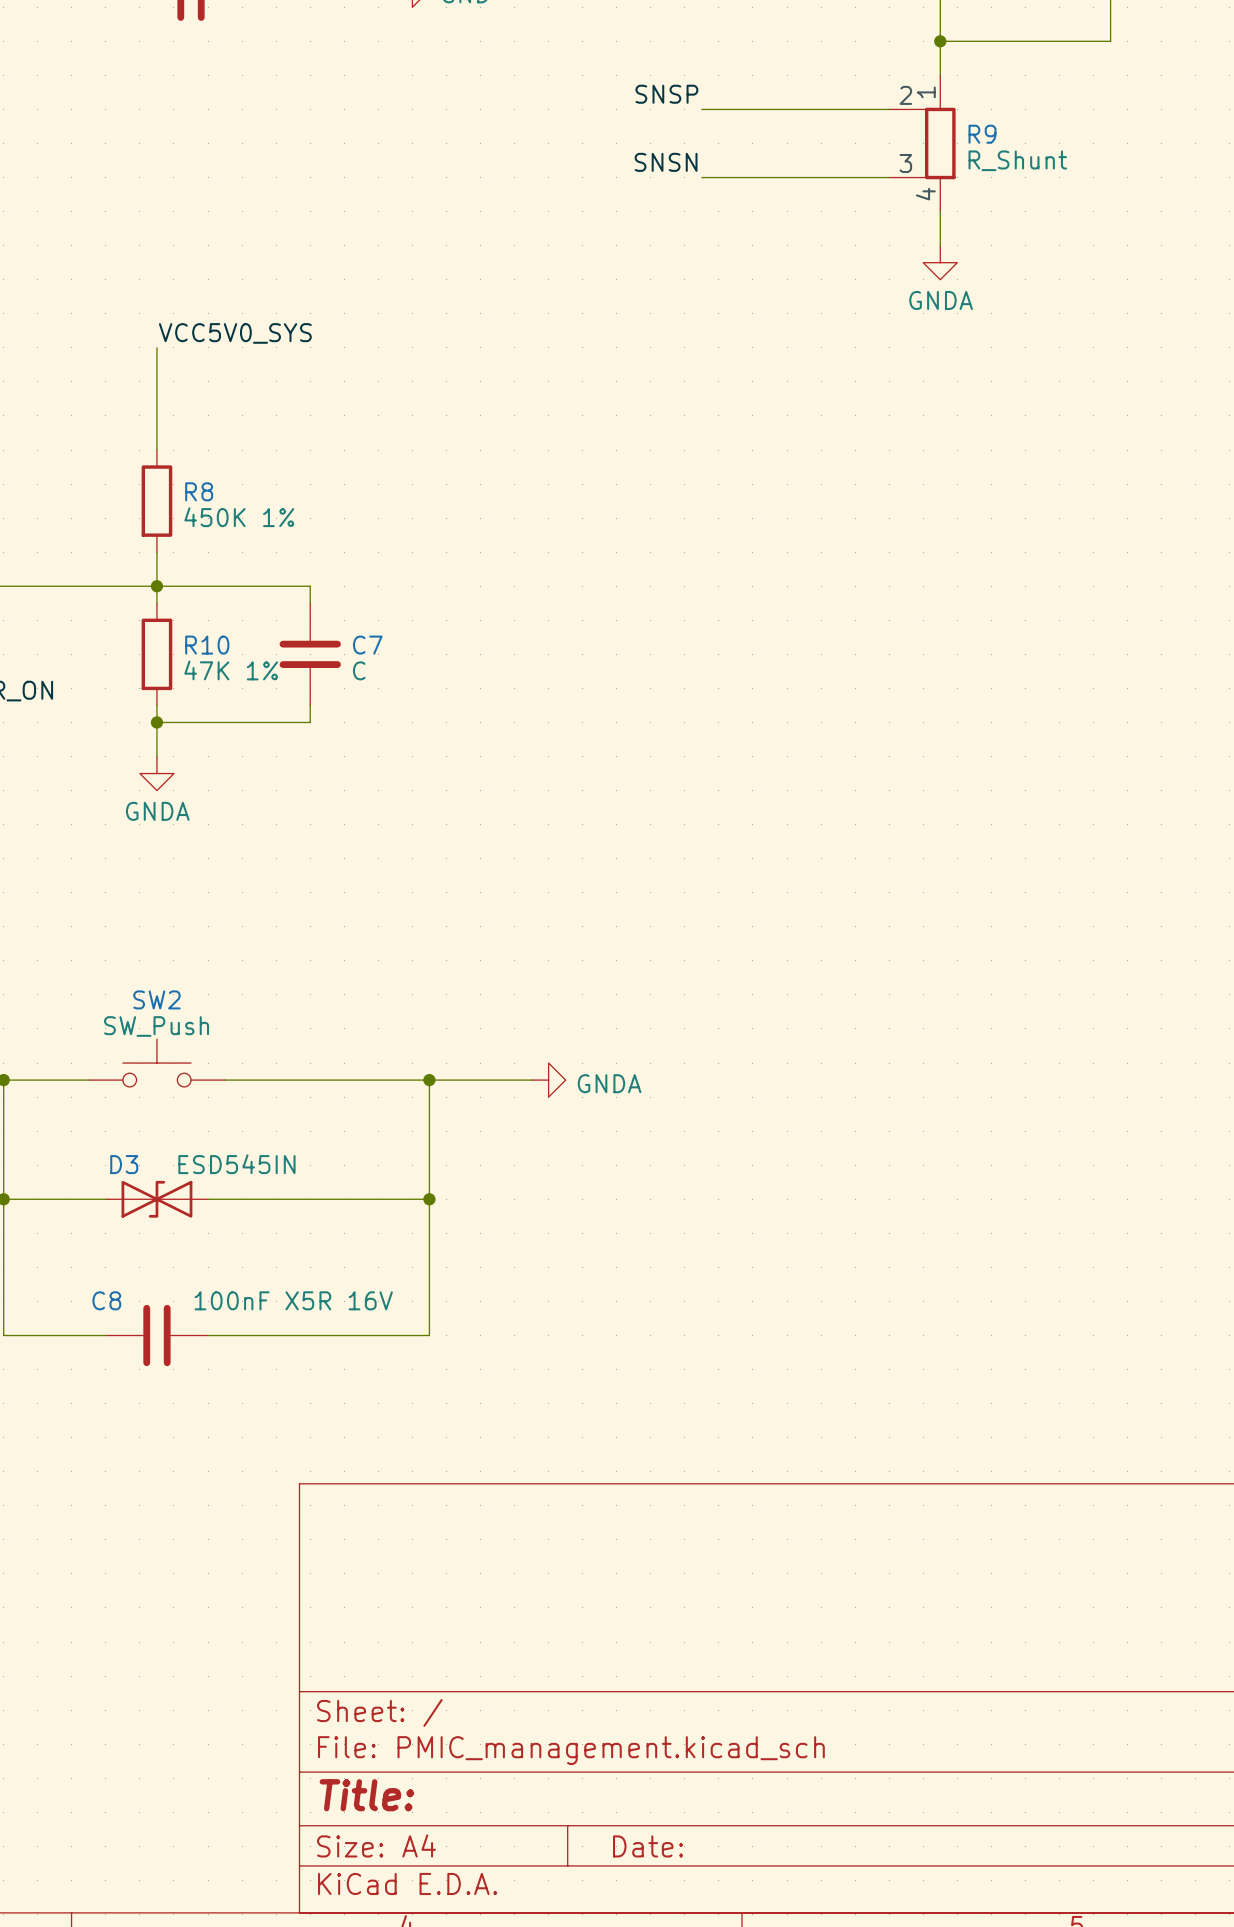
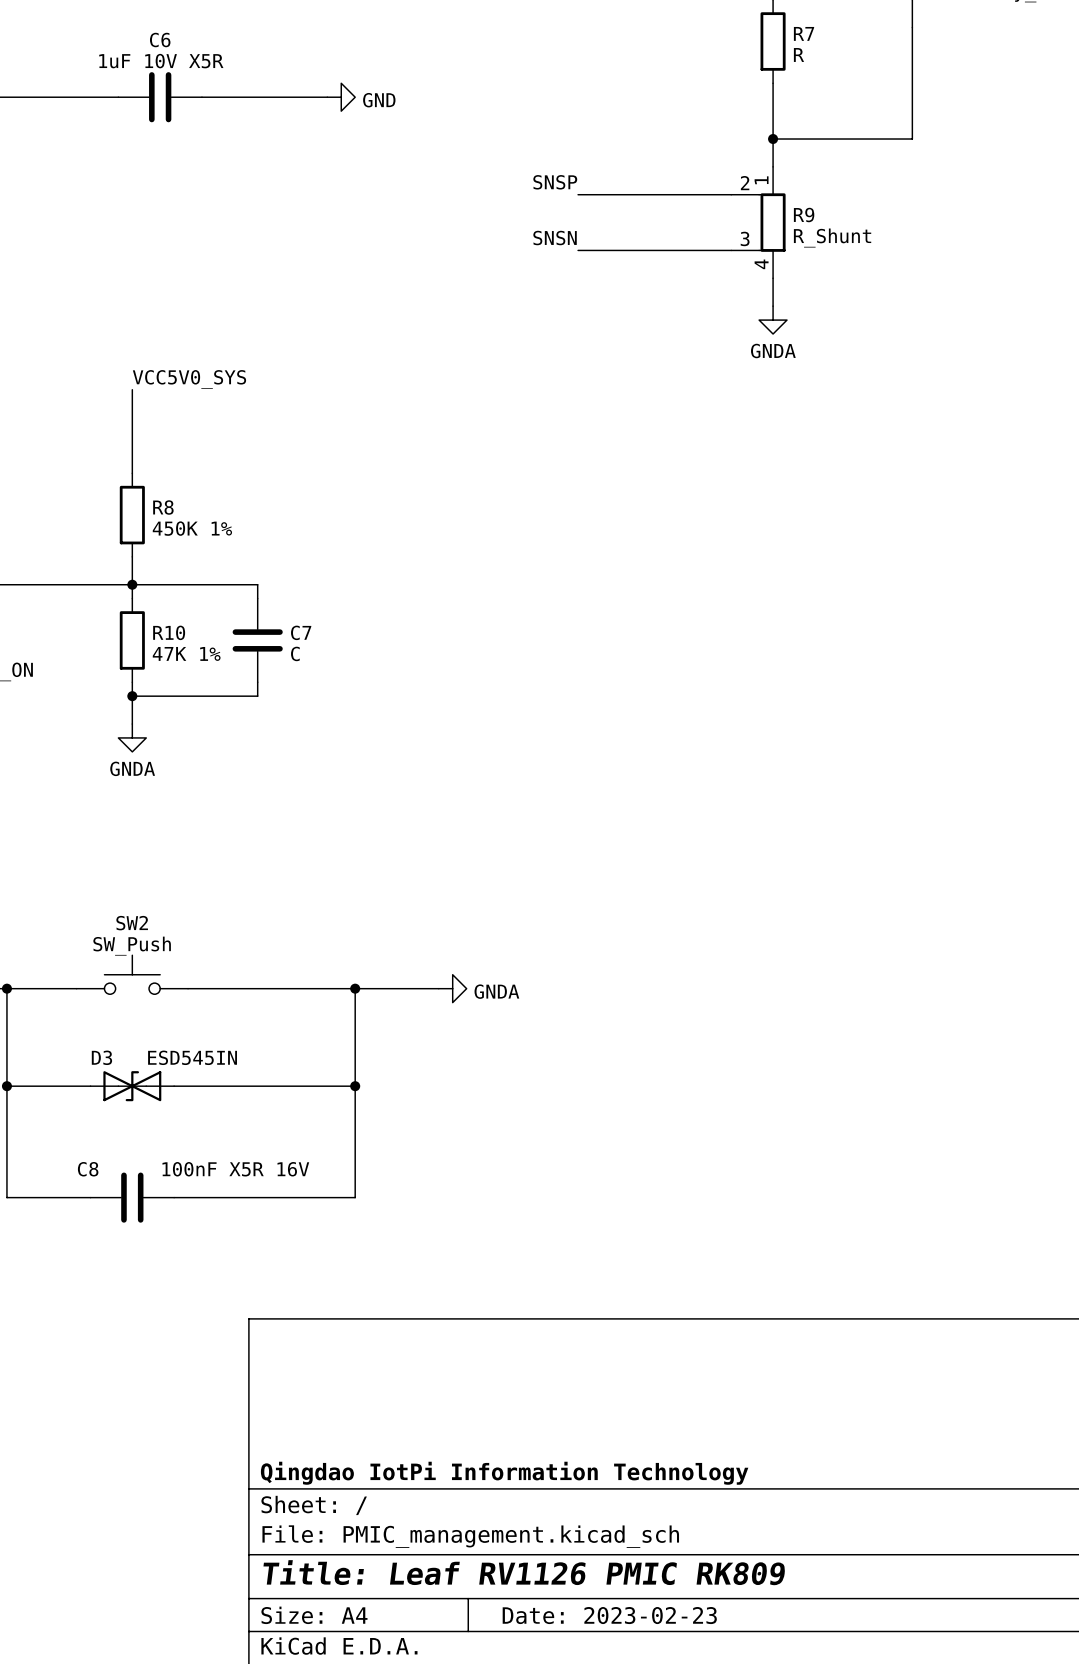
title block: none -> Qingdao IotPi Information Technology (504, 1473)
title block: Title: (366, 1795) -> Title: Leaf RV1126 PMIC RK809 (524, 1572)
title block: Date: (648, 1846) -> Date: 2023-02-23 (609, 1615)

